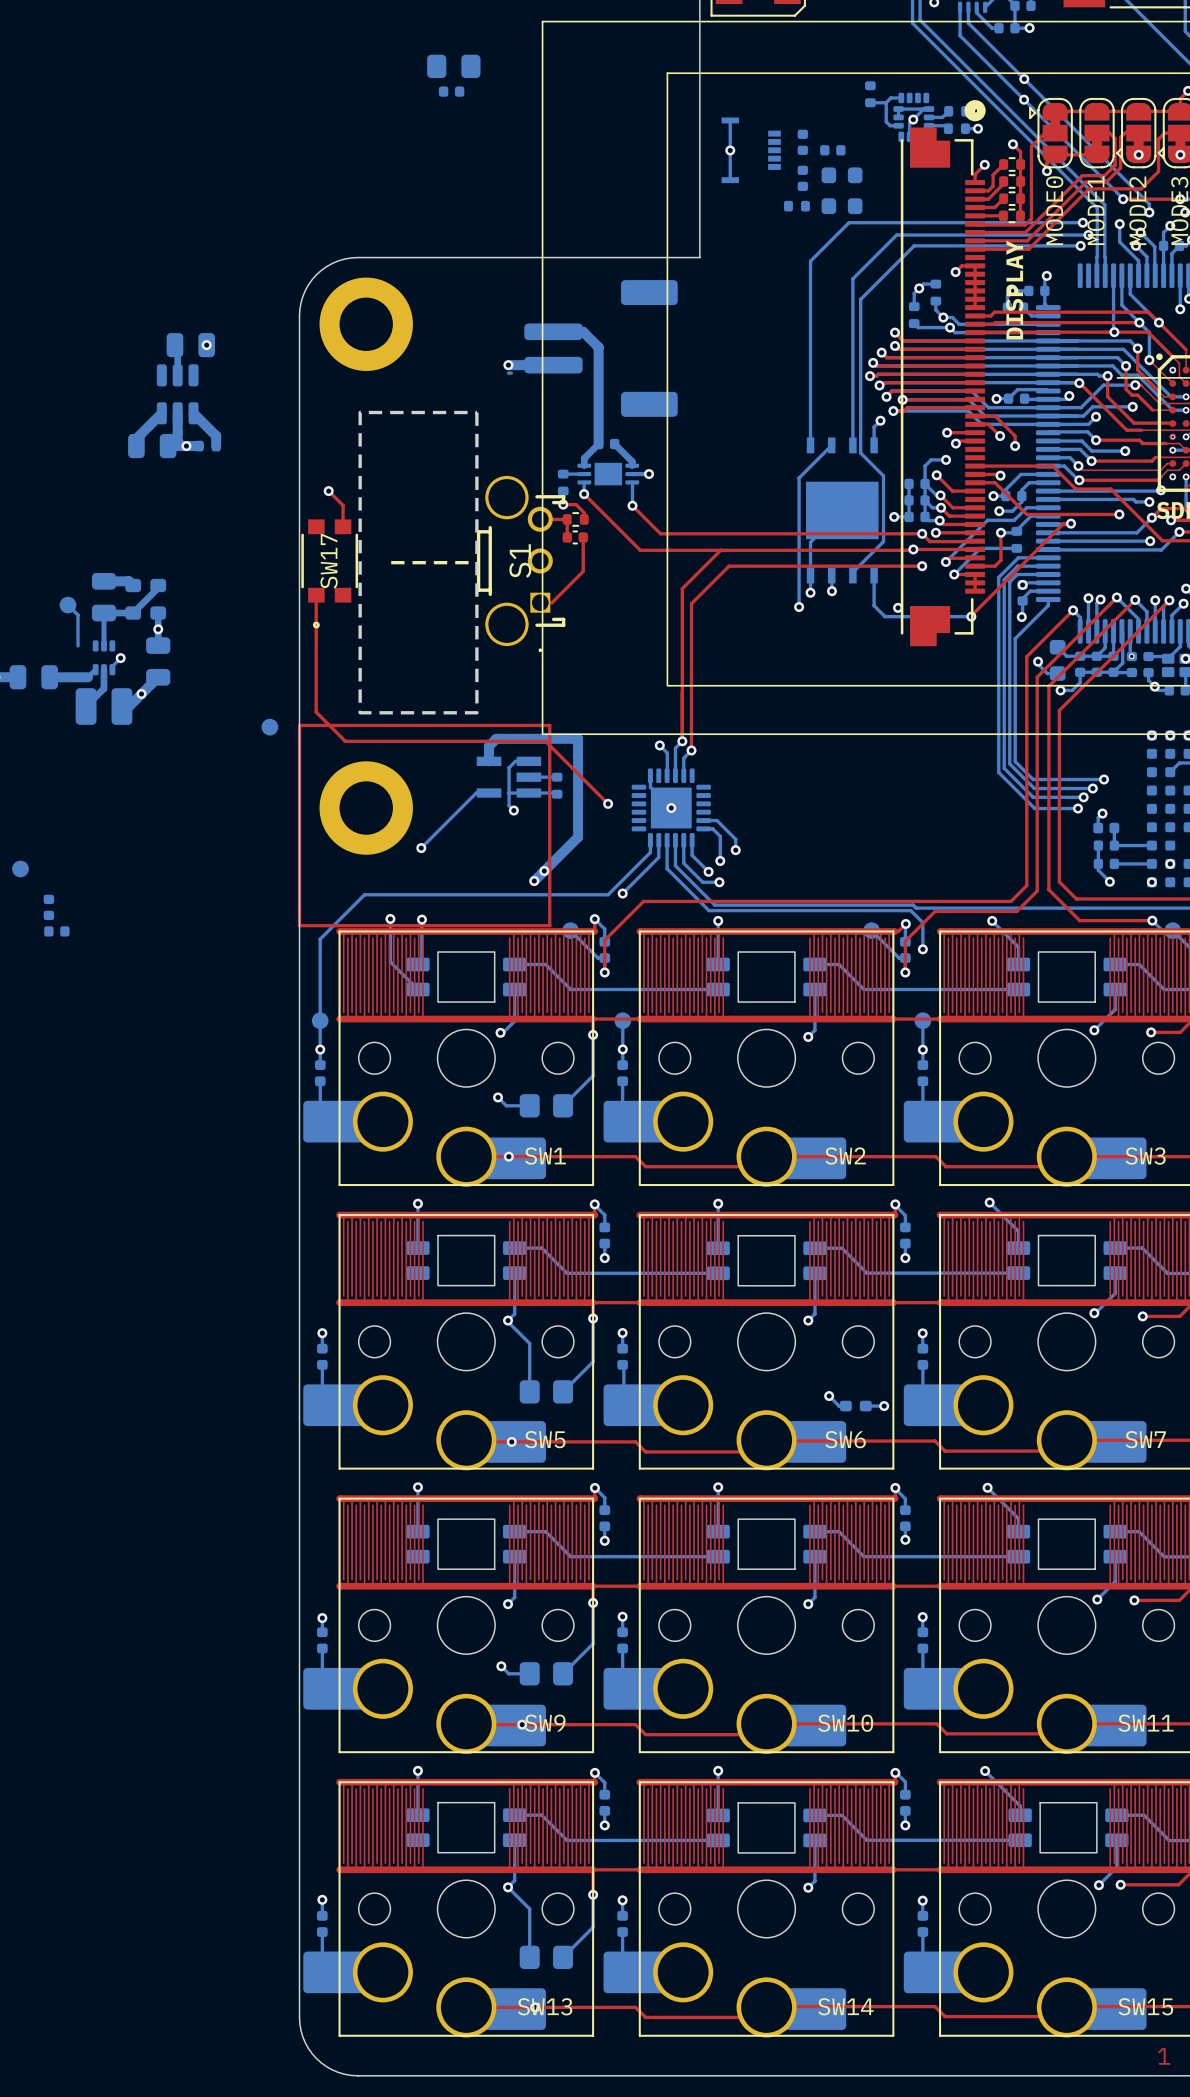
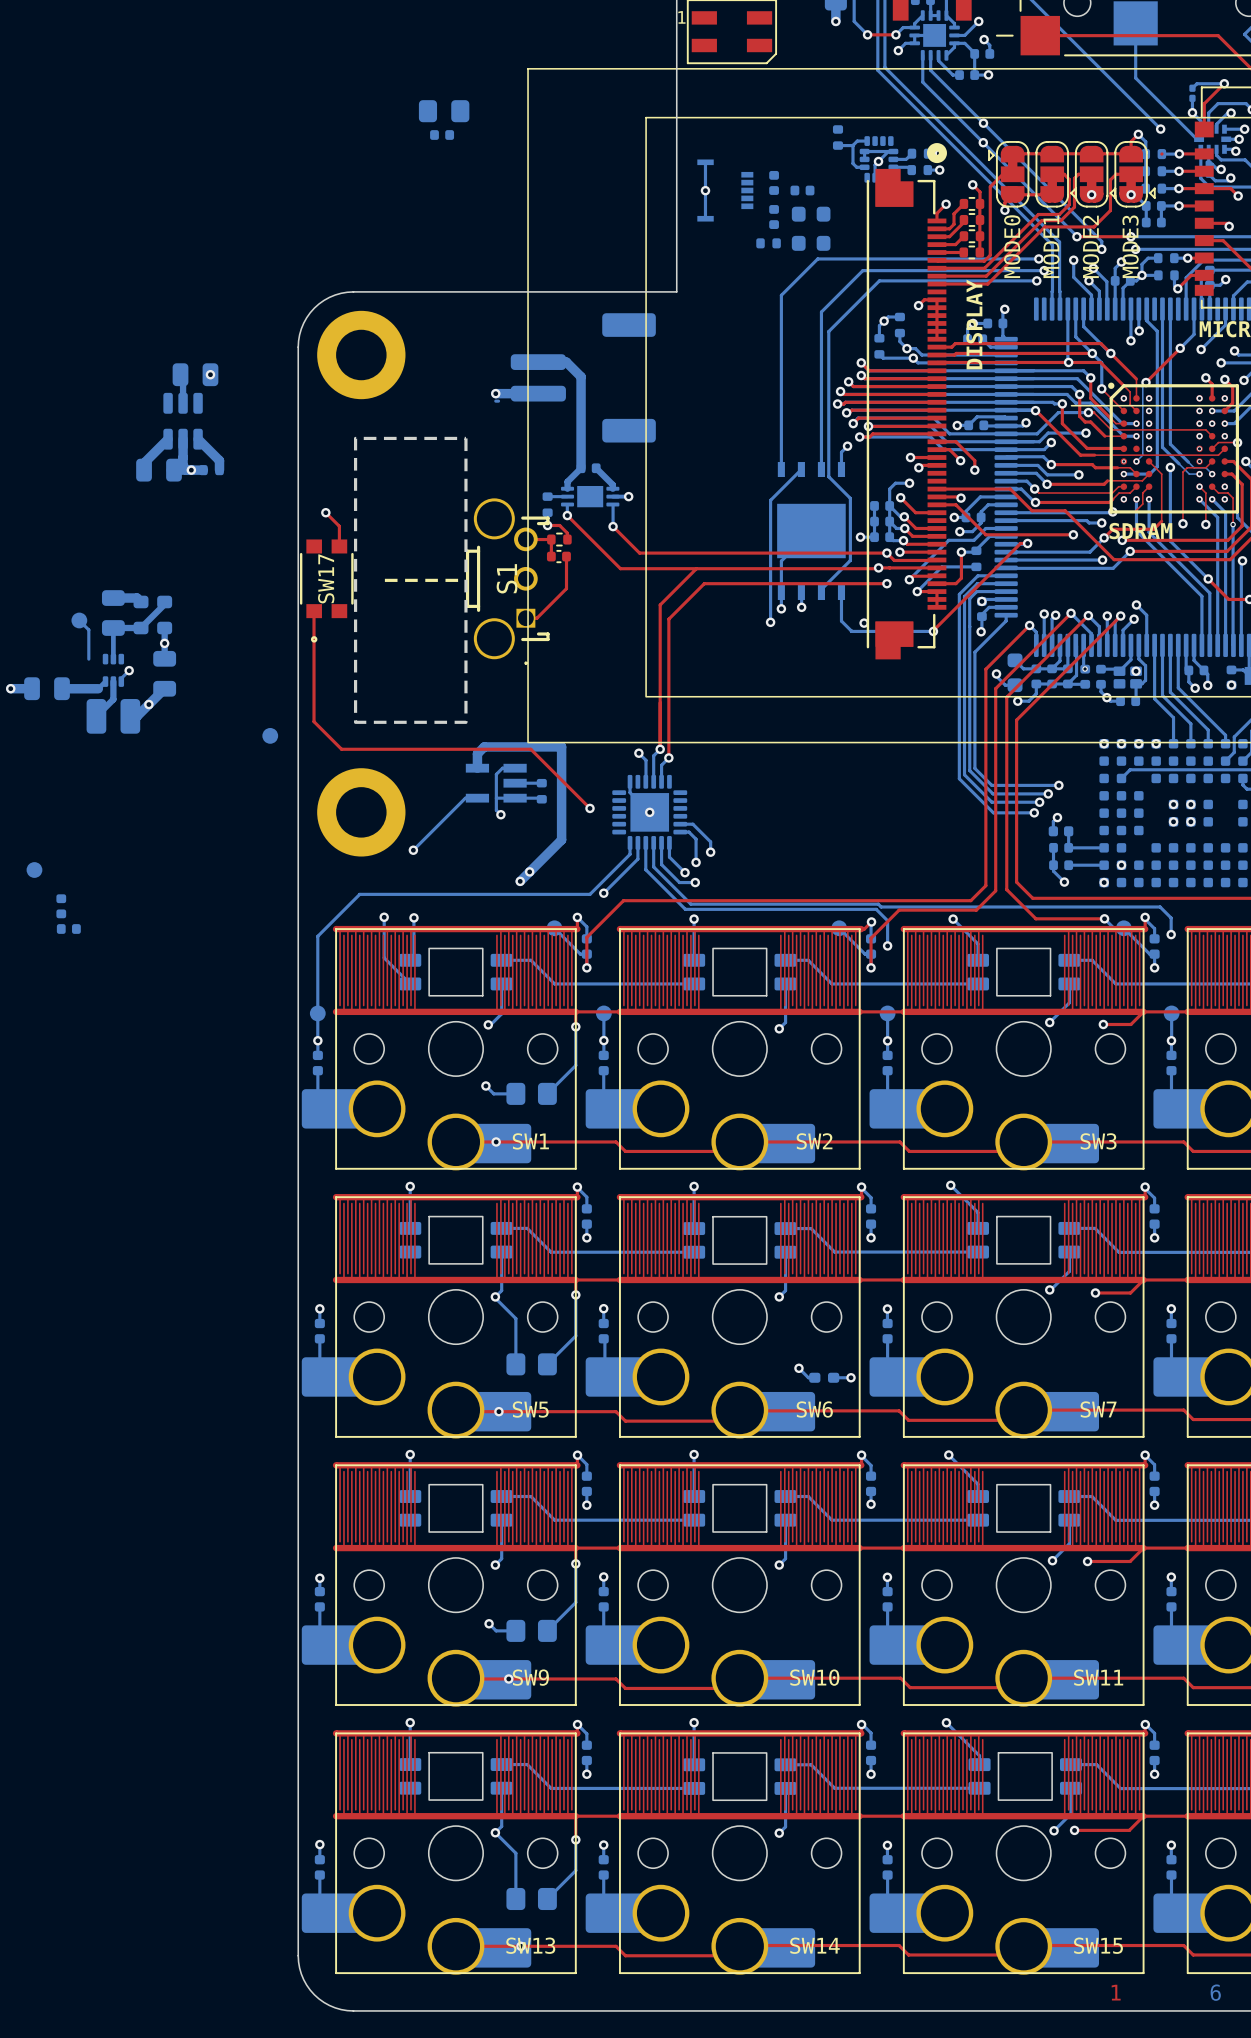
top track: (299, 725) (549, 725) (549, 925) (299, 925) (299, 725) -> none

